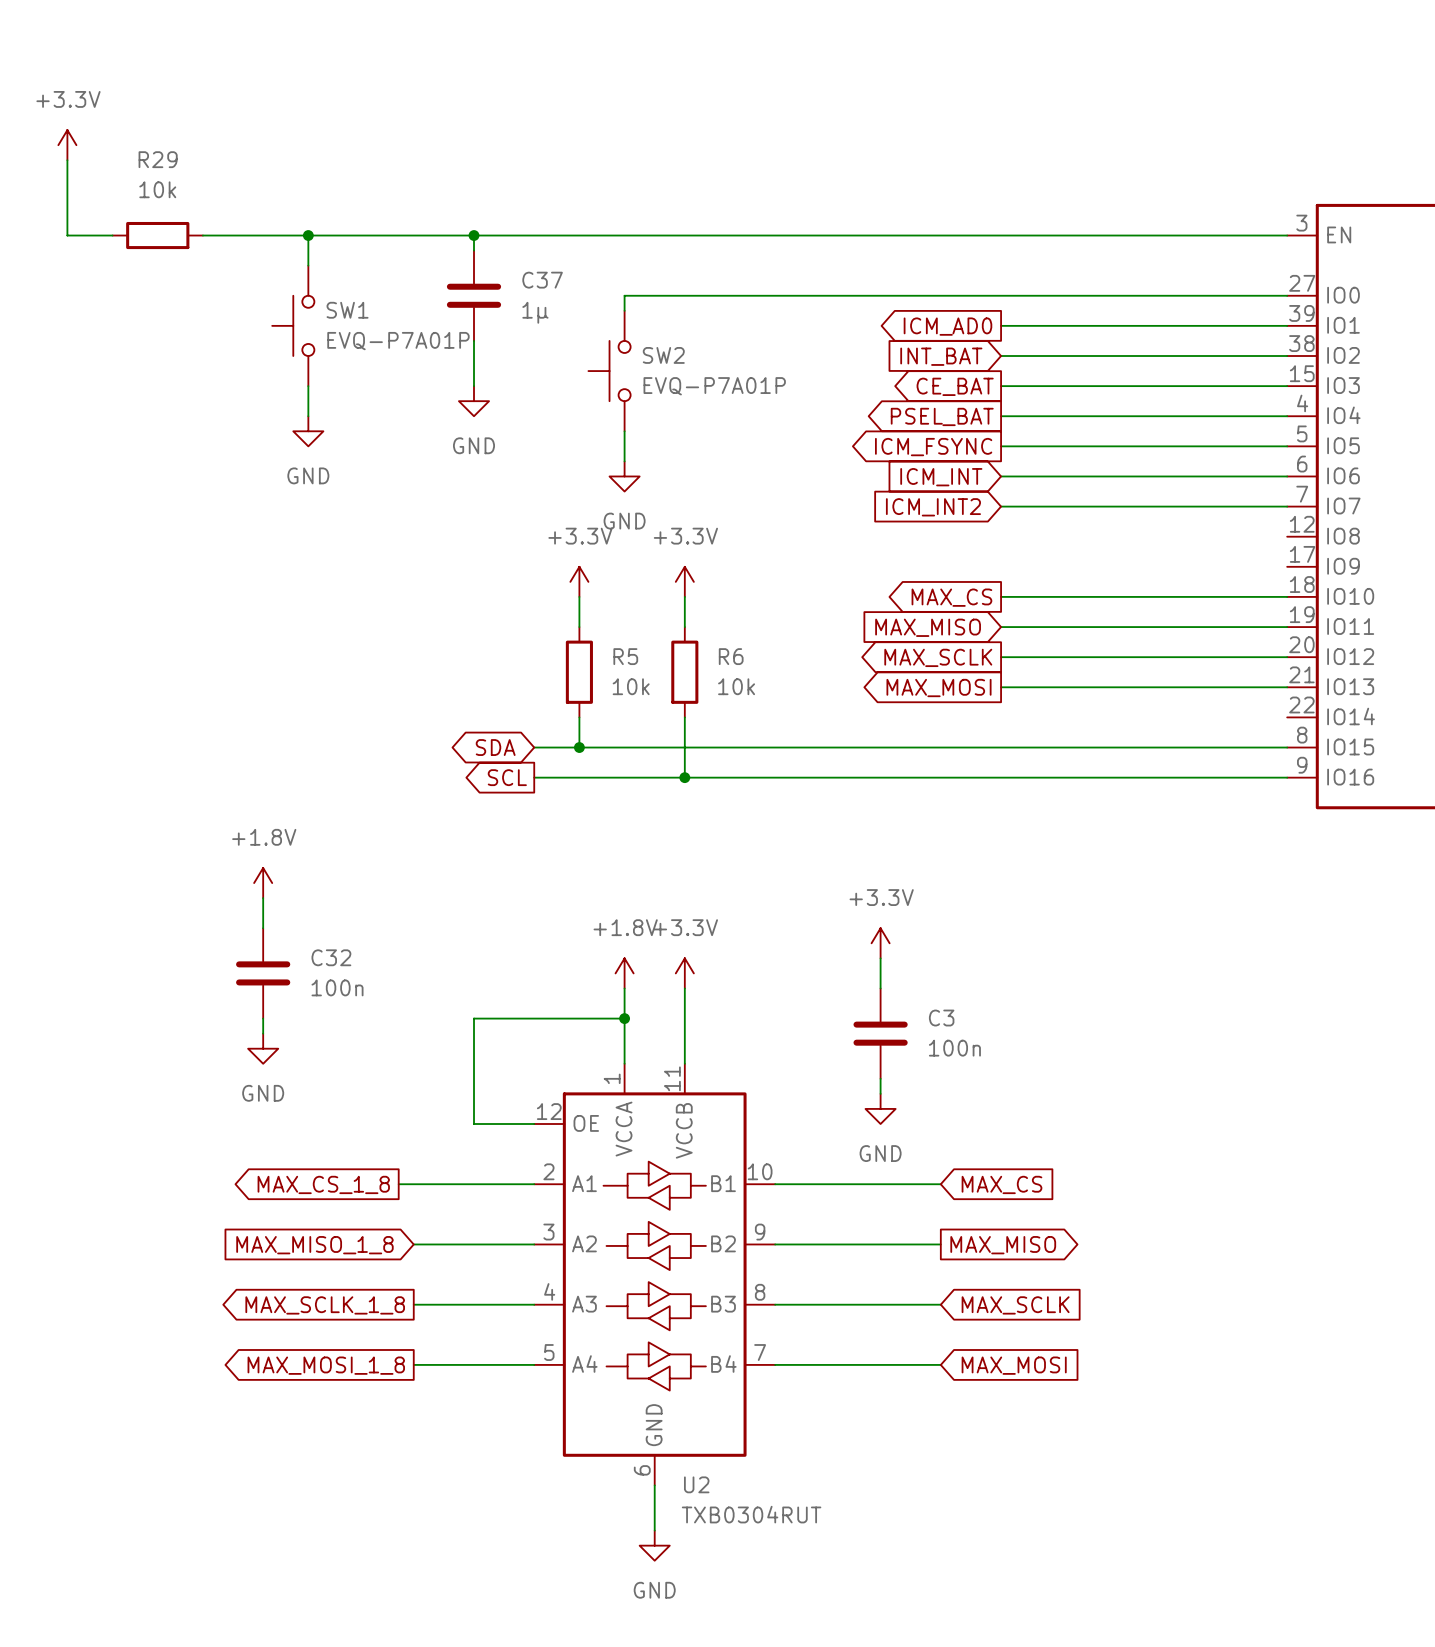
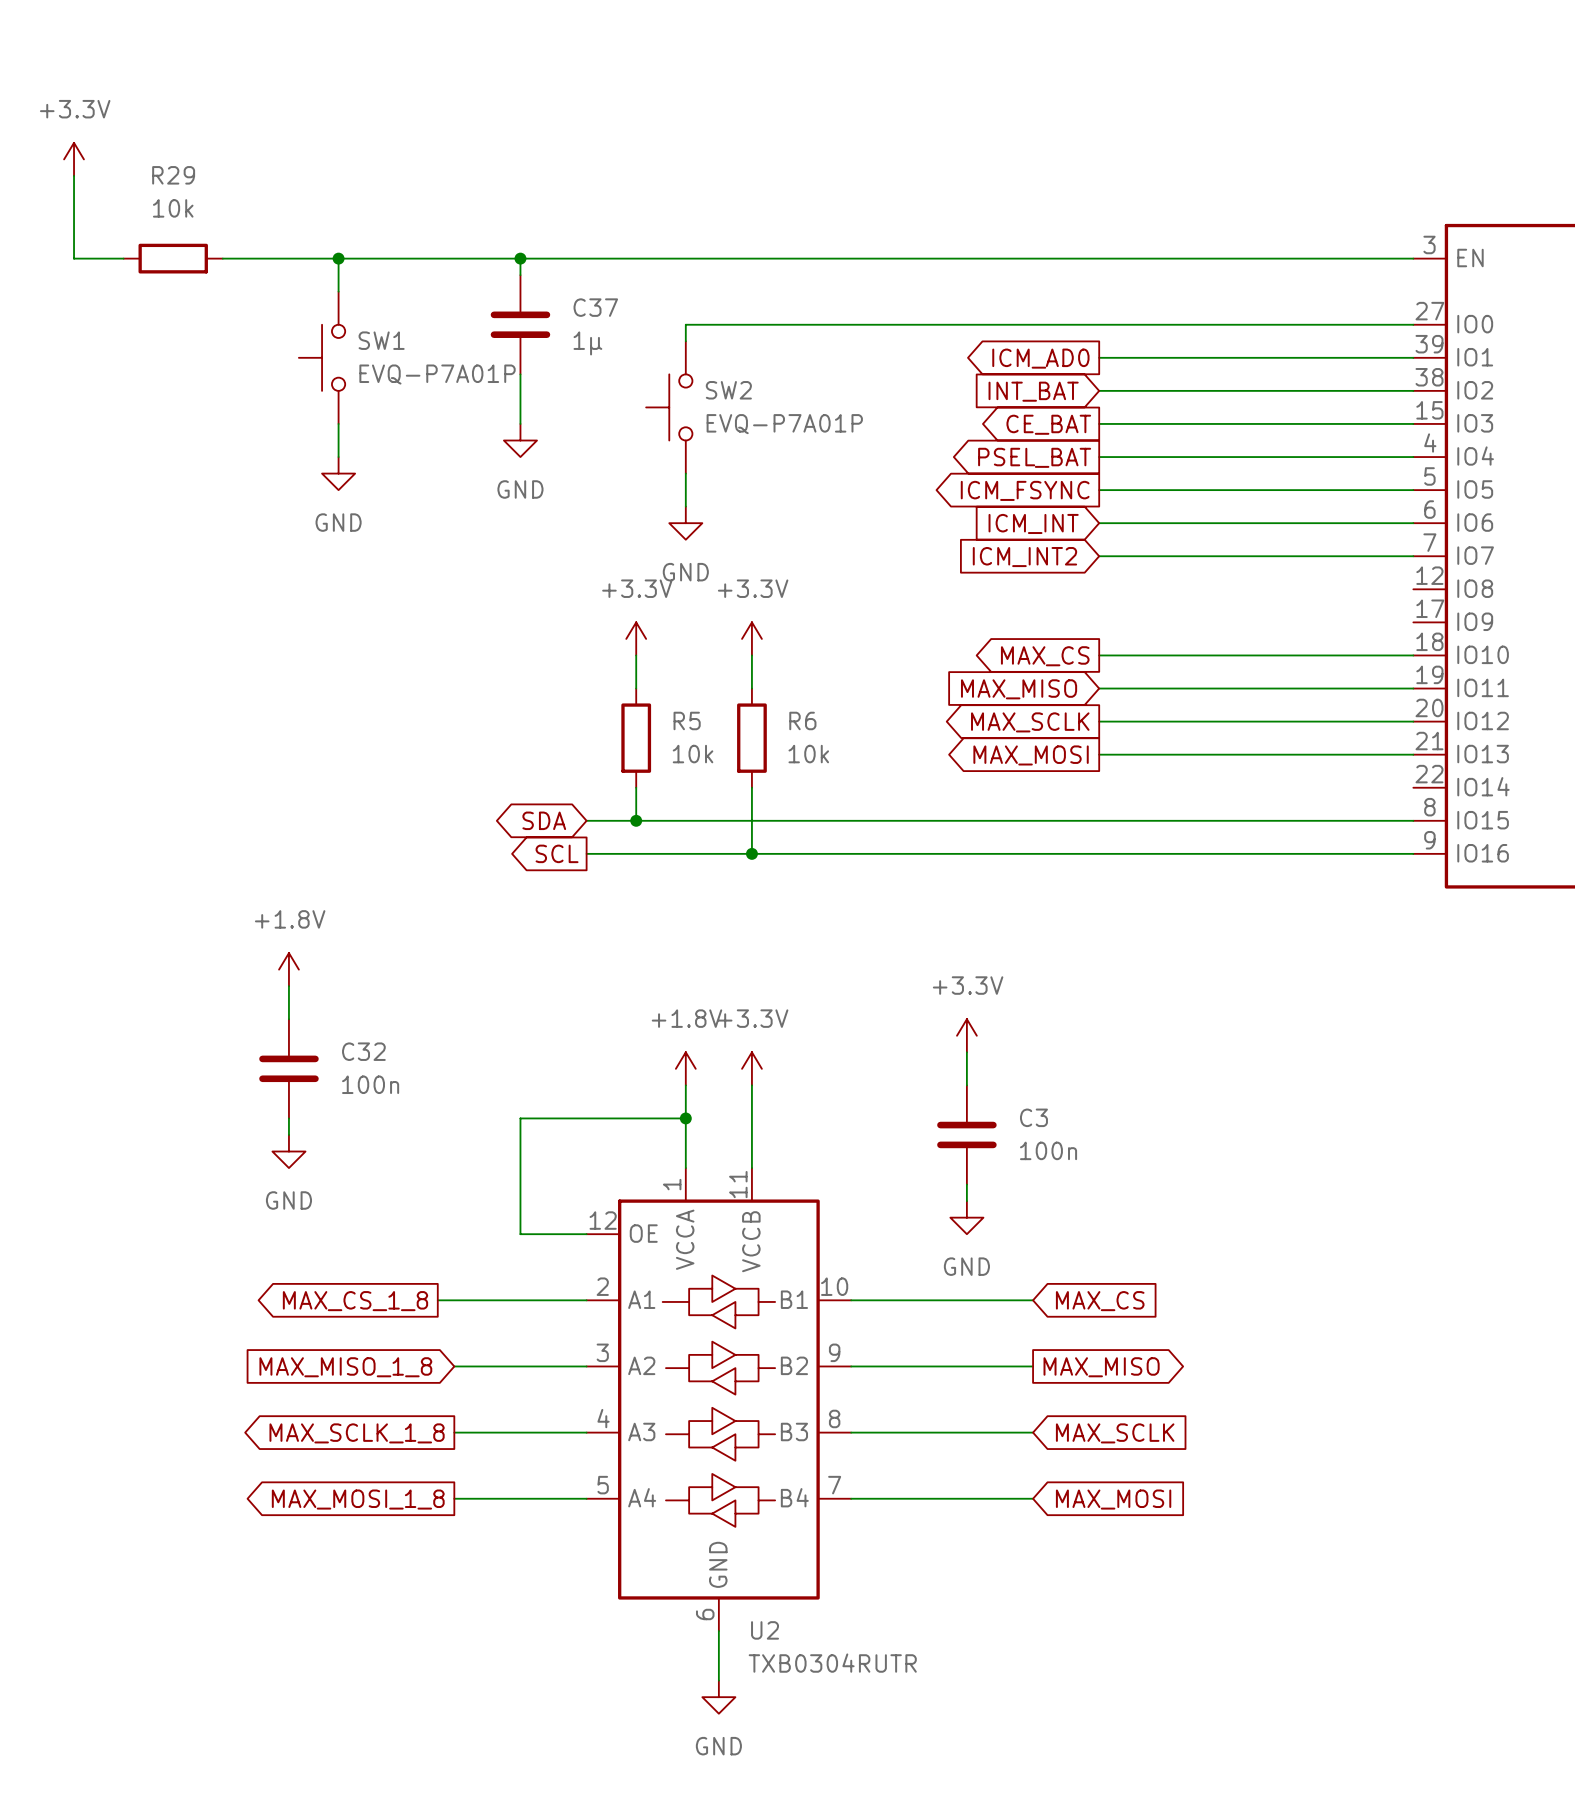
U2 value: TXB0304RUT (751, 1514) -> TXB0304RUTR (832, 1663)

